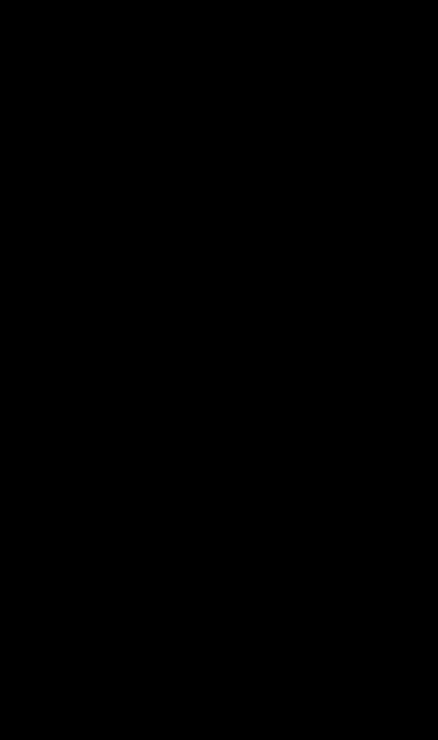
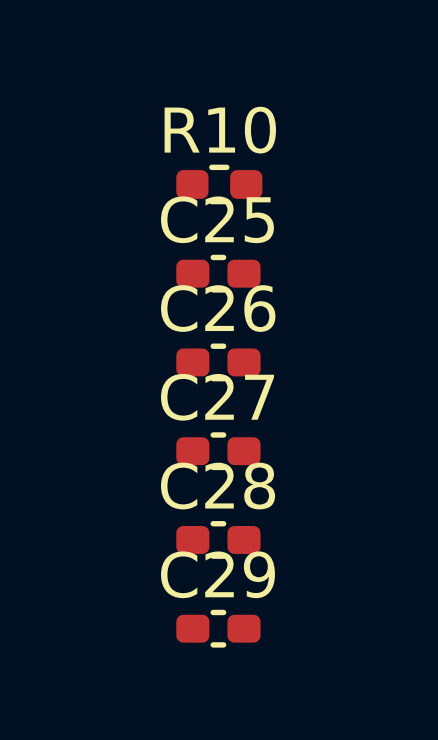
R10: none -> (219, 184)
C25: none -> (218, 273)
C26: none -> (218, 362)
C27: none -> (218, 451)
C28: none -> (218, 539)
C29: none -> (218, 628)

